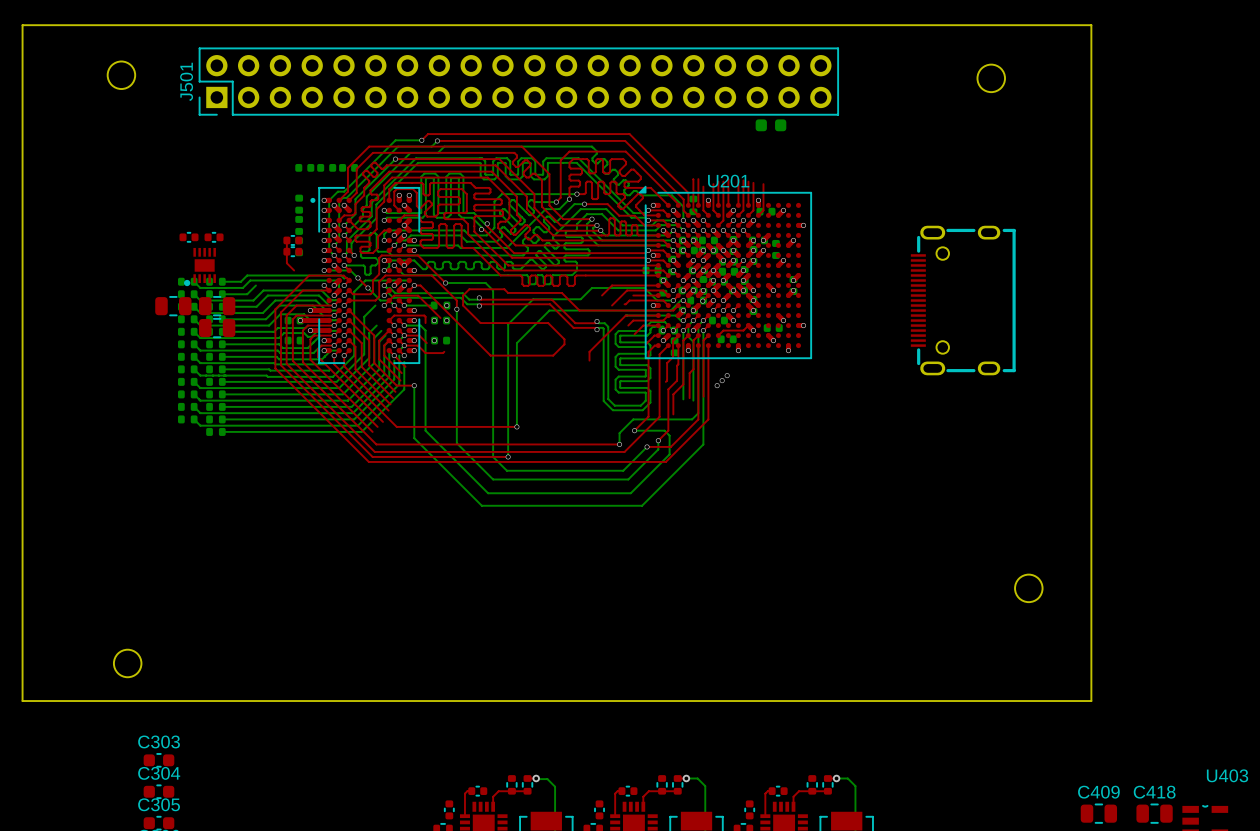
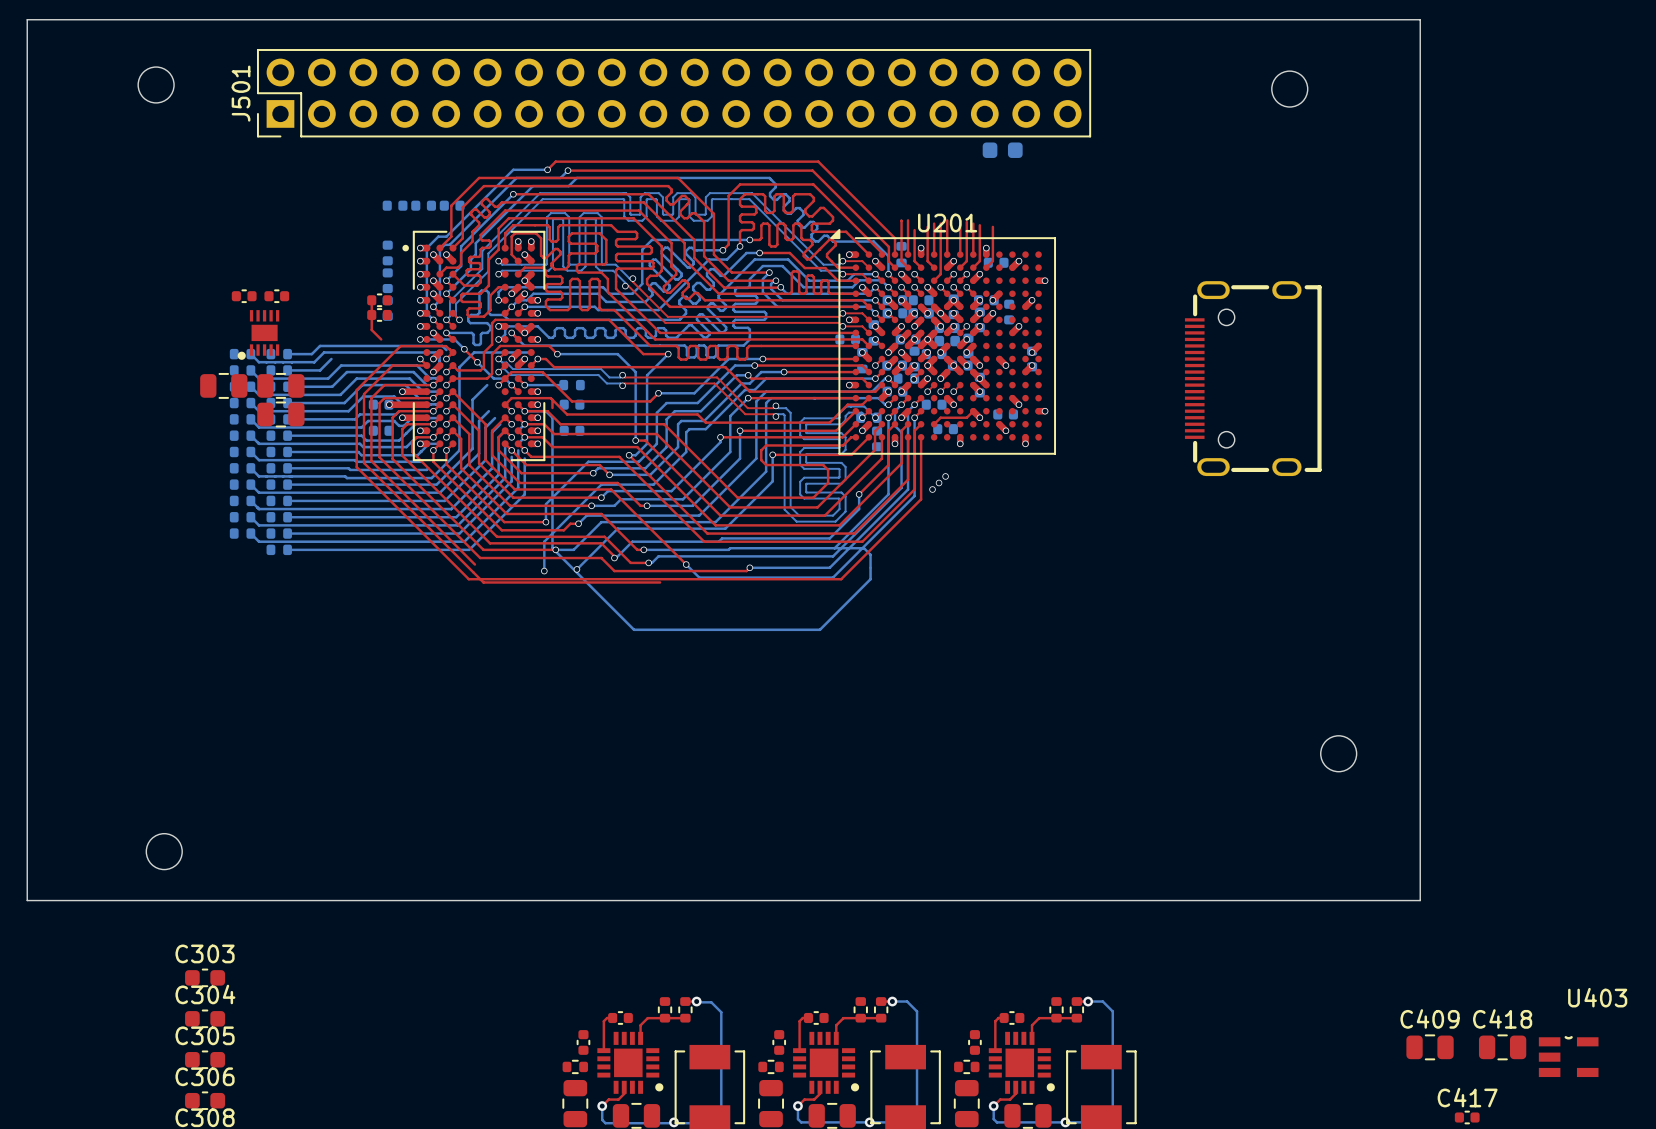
top track: (418, 255) (445, 283) -> (542, 319) (609, 319) (643, 354) (668, 354)
top track: (423, 275) (431, 275) (456, 300) (456, 309) -> (549, 345) (557, 354)
bottom track: none -> (557, 354) (617, 354) (635, 372) (635, 440)
via: none -> (557, 354)
bottom track: none -> (668, 354) (647, 375) (647, 443) (635, 455) (629, 455)
via: none -> (668, 354)
bottom track: (445, 283) (485, 283) (493, 290) (493, 456) (506, 470) (623, 470) (640, 453) -> (686, 564) (699, 577) (833, 577)
via: (445, 283) -> none
bottom track: none -> (762, 359) (728, 359) (694, 393) (658, 393)
via: none -> (762, 359)
top track: (612, 285) (602, 295) -> (795, 359) (762, 359)
via: none -> (754, 365)
top track: (627, 290) (612, 305) -> (815, 365) (754, 365)
top track: (426, 291) (490, 355) (553, 355) (564, 344) (564, 339) (548, 323) (480, 323) (463, 305) (463, 295) (469, 289) (504, 289) (508, 292) (561, 292) (579, 310) -> (554, 367) (725, 367) (749, 391) (753, 391)
top track: none -> (784, 372) (823, 372)
bottom track: none -> (784, 372) (761, 372) (749, 383) (741, 383) (704, 421) (681, 421) (678, 424) (678, 447) (650, 474) (609, 474)
via: none -> (784, 372)
bottom track: none -> (748, 375) (736, 375) (700, 411) (674, 411) (666, 419) (666, 447) (645, 468) (598, 468) (593, 473)
via: none -> (748, 375)
top track: (629, 300) (624, 304) -> (818, 378) (751, 378) (748, 375)
bottom track: (657, 300) (644, 288) (592, 288) (580, 299) (533, 299) (513, 319) -> (754, 365) (735, 365) (697, 403) (666, 403)
bottom track: none -> (854, 378) (766, 378) (754, 390) (744, 390) (705, 429) (689, 429) (686, 432) (686, 451) (653, 484) (601, 484) (544, 541) (544, 571)
via: (446, 305) -> none
bottom track: (456, 309) (456, 443) (493, 479) (628, 479) (658, 449) (658, 440) -> none
via: (456, 309) -> none
bottom track: (589, 310) (549, 310) (516, 343) (516, 426) -> (766, 391) (756, 401) (756, 458) (699, 515) (586, 515) (578, 523)
top track: none -> (658, 393) (650, 401) (572, 401)
via: none -> (658, 393)
bottom track: none -> (748, 398) (730, 416) (730, 451) (682, 499) (620, 499) (614, 505) (591, 505)
via: none -> (748, 398)
top track: (625, 315) (589, 351) (589, 360) -> (813, 398) (748, 398)
bottom track: none -> (813, 398) (771, 398) (766, 403) (766, 471) (715, 522) (601, 522) (573, 549) (555, 549)
via: (434, 320) -> none
via: (446, 320) -> none
top track: (652, 320) (633, 320) (628, 325) -> (847, 404) (829, 422) (705, 422) (697, 414) (567, 414) (552, 399)
bottom track: (508, 324) (508, 456) -> (660, 409) (656, 412) (656, 443) (638, 461) (588, 461) (545, 504) (545, 522)
top track: (658, 325) (643, 325) (634, 334) -> (855, 411) (836, 430) (740, 430)
top track: (658, 335) (654, 335) (645, 344) -> (855, 424) (842, 437) (720, 437)
via: (434, 340) -> none
bottom track: none -> (740, 430) (740, 458) (692, 505) (647, 505)
via: none -> (740, 430)
bottom track: none -> (720, 437) (720, 442) (671, 491) (607, 491) (601, 497)
via: none -> (720, 437)
via: none -> (635, 440)
top track: (444, 351) (443, 353) -> (901, 463) (839, 525) (715, 525) (637, 447) (575, 447)
top track: (648, 351) (648, 416) (634, 430) -> (843, 445) (766, 445) (761, 450) (761, 460) (766, 465) (823, 465) (828, 469) (828, 482) (813, 497) (737, 497) (664, 424) (560, 424) (547, 411) (524, 411)
top track: (659, 354) (659, 416) -> (857, 448) (851, 454) (772, 454)
top track: (673, 355) (667, 363) (665, 381) -> (875, 449) (817, 507) (730, 507) (656, 434) (554, 434)
via: none -> (629, 455)
bottom track: none -> (772, 454) (772, 481) (725, 528) (617, 528) (576, 569)
via: none -> (772, 454)
top track: (678, 361) (677, 380) (668, 389) (668, 430) (658, 440) -> (881, 458) (824, 515) (720, 515) (645, 440) (635, 440)
top track: (693, 365) (693, 369) (689, 373) (689, 398) -> none
top track: none -> (526, 465) (599, 465) (609, 474)
top track: (683, 366) (683, 384) (673, 394) (673, 414) -> (888, 465) (859, 494)
top track: none -> (521, 473) (593, 473)
via: none -> (593, 473)
via: none -> (609, 474)
top track: (698, 378) (698, 419) (670, 446) (647, 446) -> (908, 479) (857, 530)
top track: none -> (519, 482) (617, 482) (640, 505) (647, 505)
bottom track: (693, 384) (693, 400) -> (901, 487) (833, 556) (658, 556) (651, 562) (648, 562)
top track: none -> (537, 489) (611, 489) (686, 564)
bottom track: (414, 385) (414, 438) (481, 505) (642, 505) (703, 444) (703, 390) -> (841, 569) (914, 496)
via: (414, 385) -> none
bottom track: (698, 385) (698, 413) (692, 419) (633, 419) (619, 433) (619, 444) -> (908, 489) (829, 567) (749, 567)
top track: (703, 385) (703, 396) -> (914, 489) (862, 541) (704, 541) (619, 456) (531, 456) (524, 450)
bottom track: none -> (859, 494) (859, 509) (829, 538) (722, 538) (718, 541) (632, 541) (614, 558)
via: none -> (859, 494)
bottom track: (683, 389) (683, 399) -> (888, 494) (834, 548)
top track: none -> (513, 497) (601, 497)
via: none -> (601, 497)
top track: (708, 393) (708, 419) (665, 461) (368, 461) (361, 454) -> (921, 499) (841, 579) (468, 579)
top track: none -> (510, 505) (591, 505)
via: none -> (591, 505)
via: none -> (647, 505)
top track: none -> (506, 513) (601, 513) (637, 549) (643, 549)
top track: none -> (504, 522) (545, 522)
via: none -> (545, 522)
top track: none -> (578, 523) (570, 523) (563, 530) (501, 530)
via: none -> (578, 523)
top track: (386, 416) (396, 426) -> (490, 543) (514, 543)
top track: (657, 419) (624, 451) (374, 451) (366, 443) -> (854, 533) (707, 533) (629, 455)
top track: none -> (497, 536) (604, 536) (630, 562) (648, 562)
top track: (463, 426) (516, 426) -> (601, 543) (614, 558)
via: (516, 426) -> none
bottom track: none -> (824, 548) (643, 549)
via: (634, 430) -> none
top track: none -> (483, 549) (555, 549)
via: none -> (555, 549)
via: none -> (643, 549)
top track: (370, 438) (376, 444) (619, 444) -> (480, 558) (601, 558) (614, 571) (746, 571) (749, 567)
via: none -> (614, 558)
via: (658, 440) -> none
via: none -> (648, 562)
via: none -> (686, 564)
via: (619, 444) -> none
via: none -> (749, 567)
via: none -> (576, 569)
via: (647, 446) -> none
via: none -> (544, 571)
via: (508, 456) -> none

